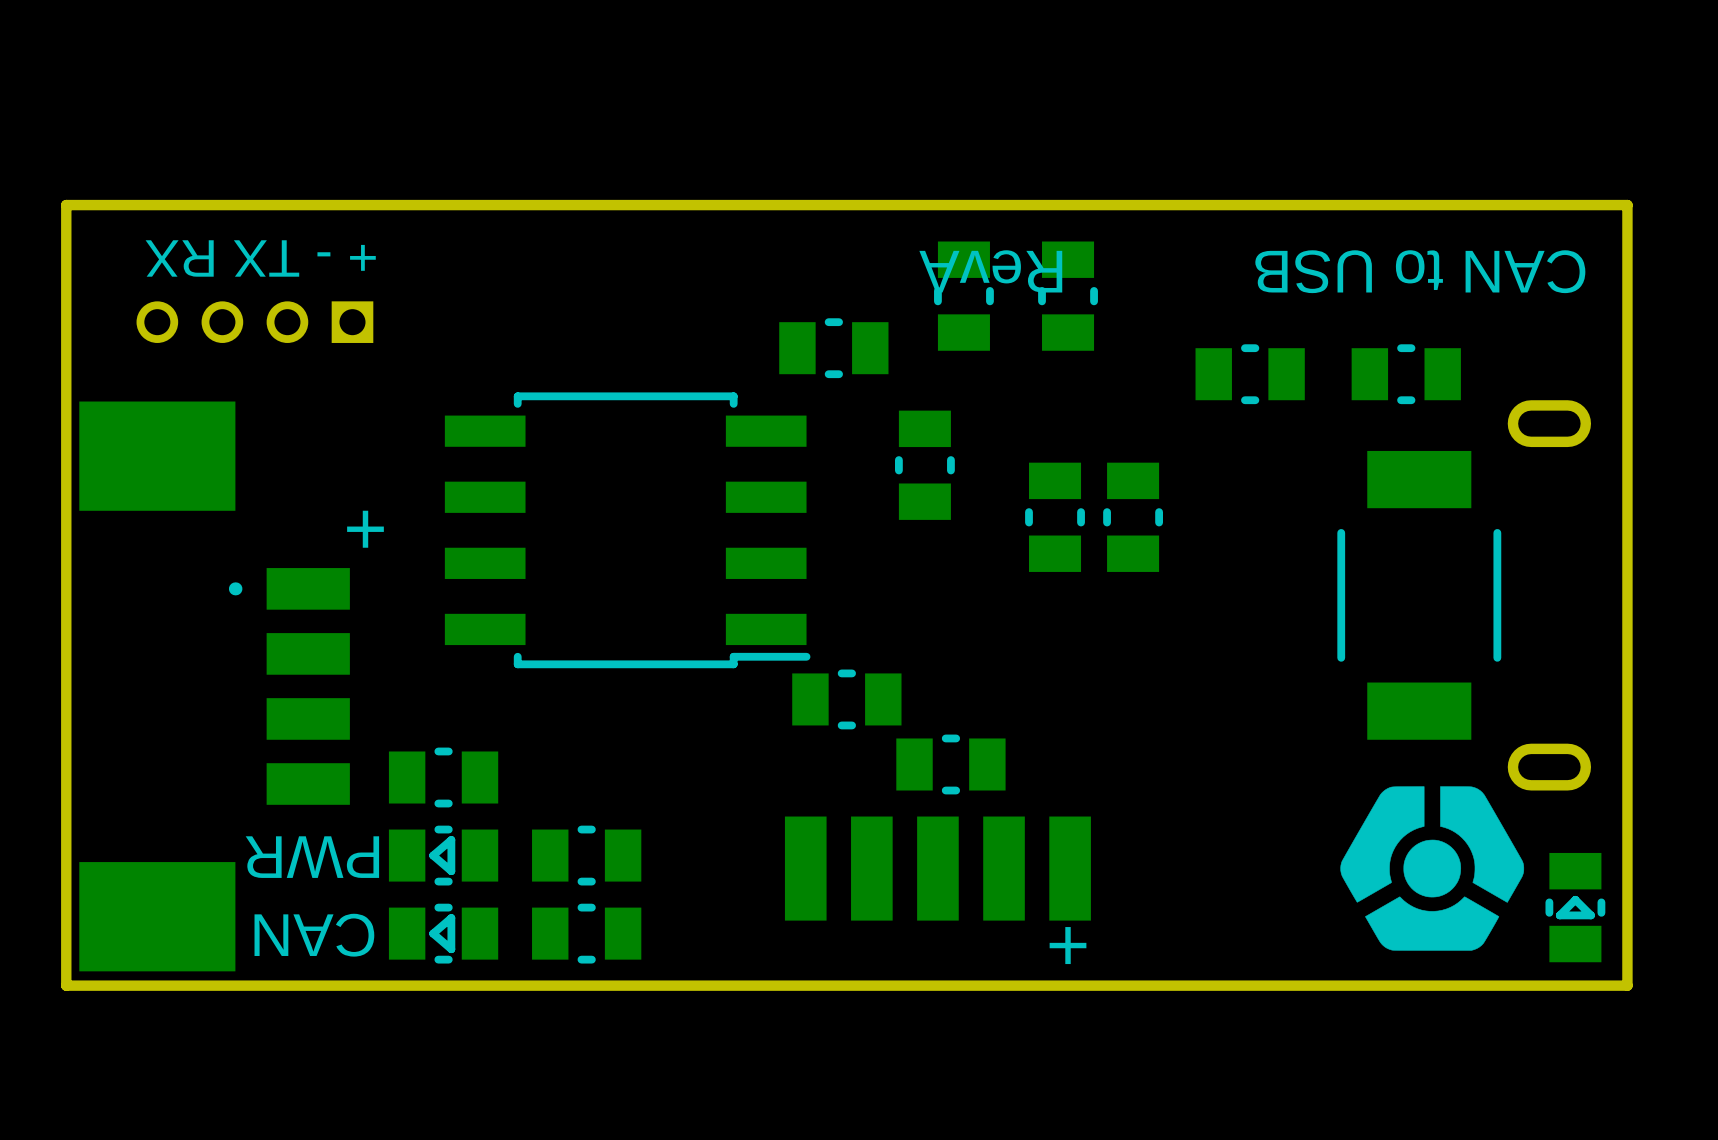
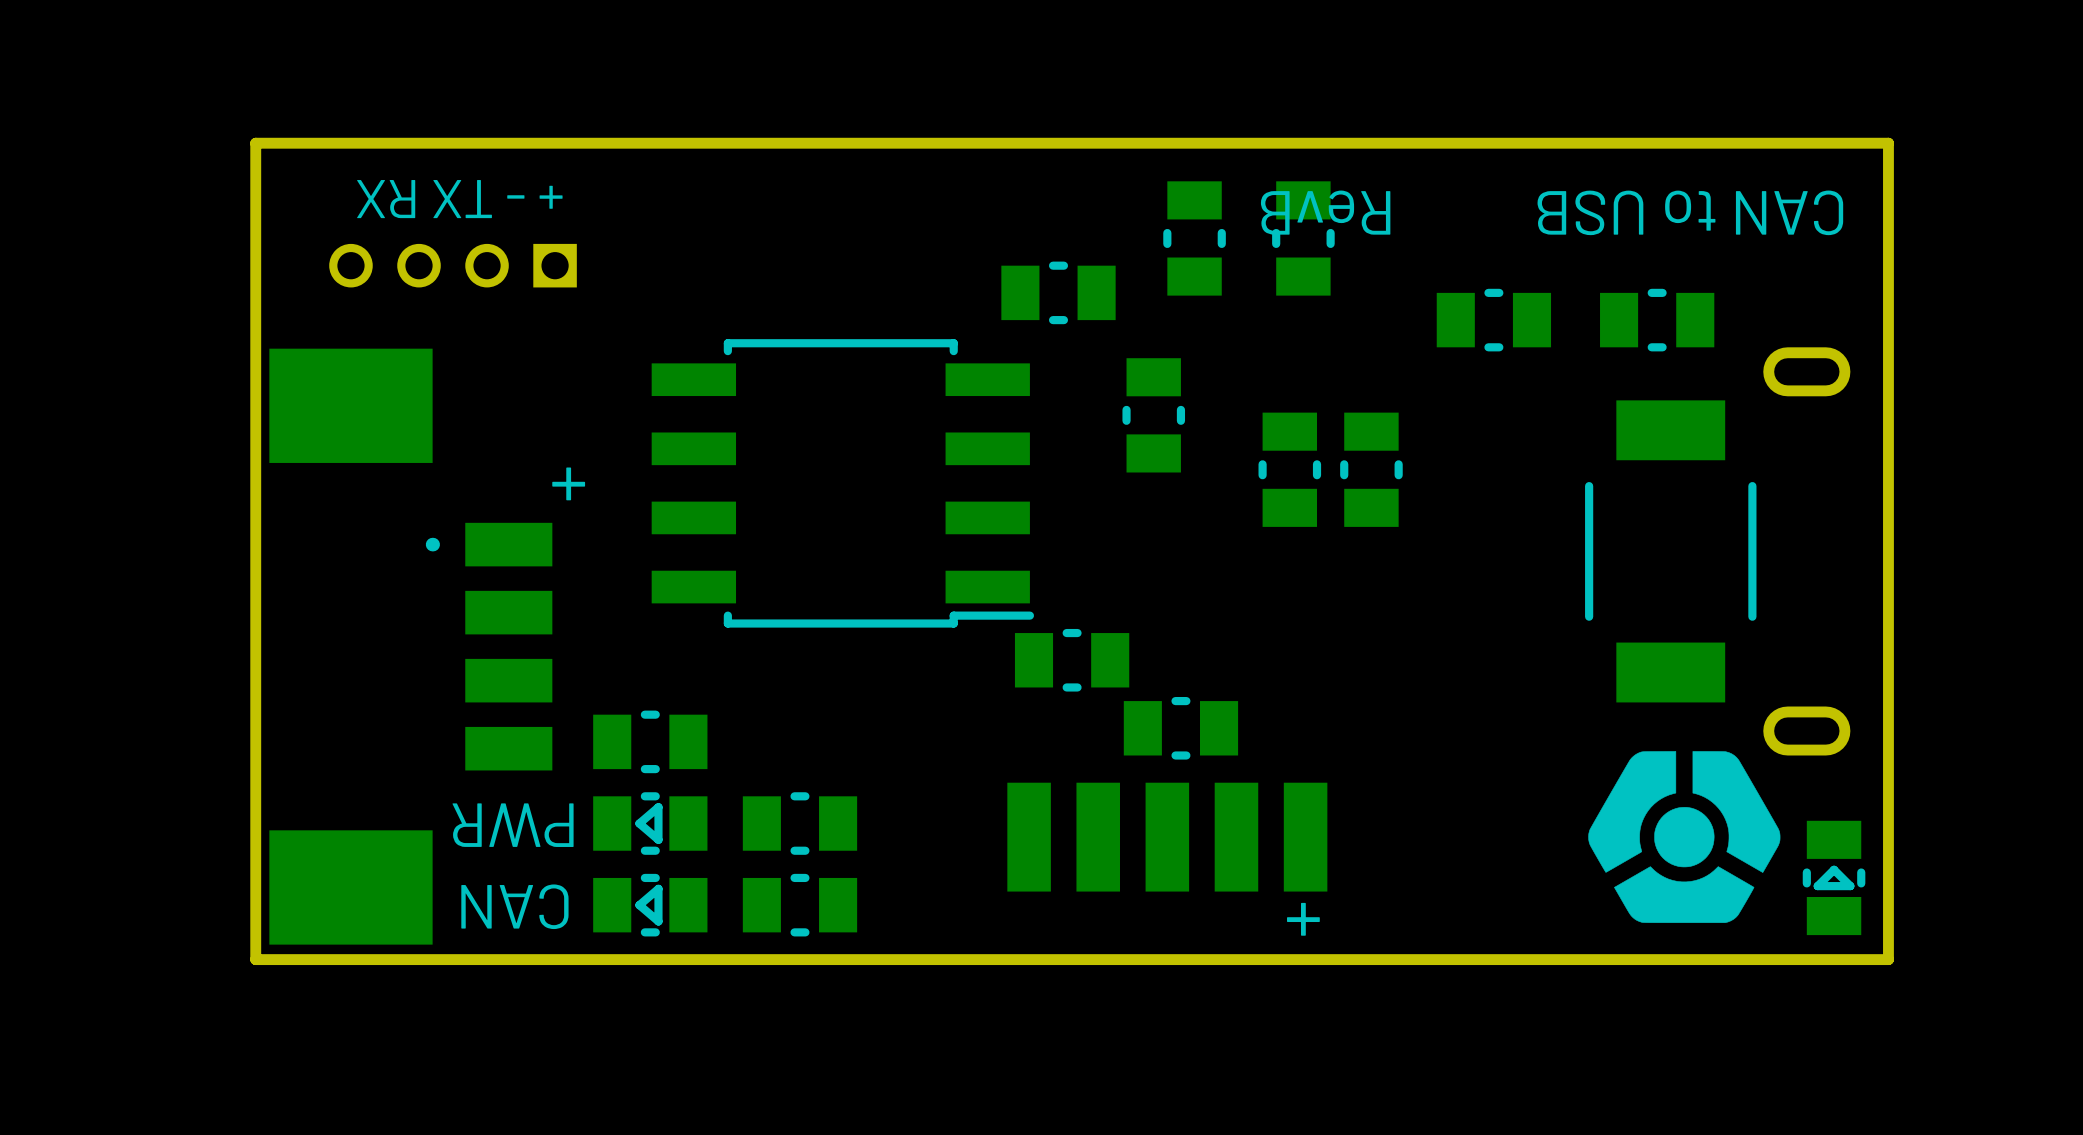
text: CAN to USB RevA (1252, 271) -> CAN to USB RevB (1552, 212)

